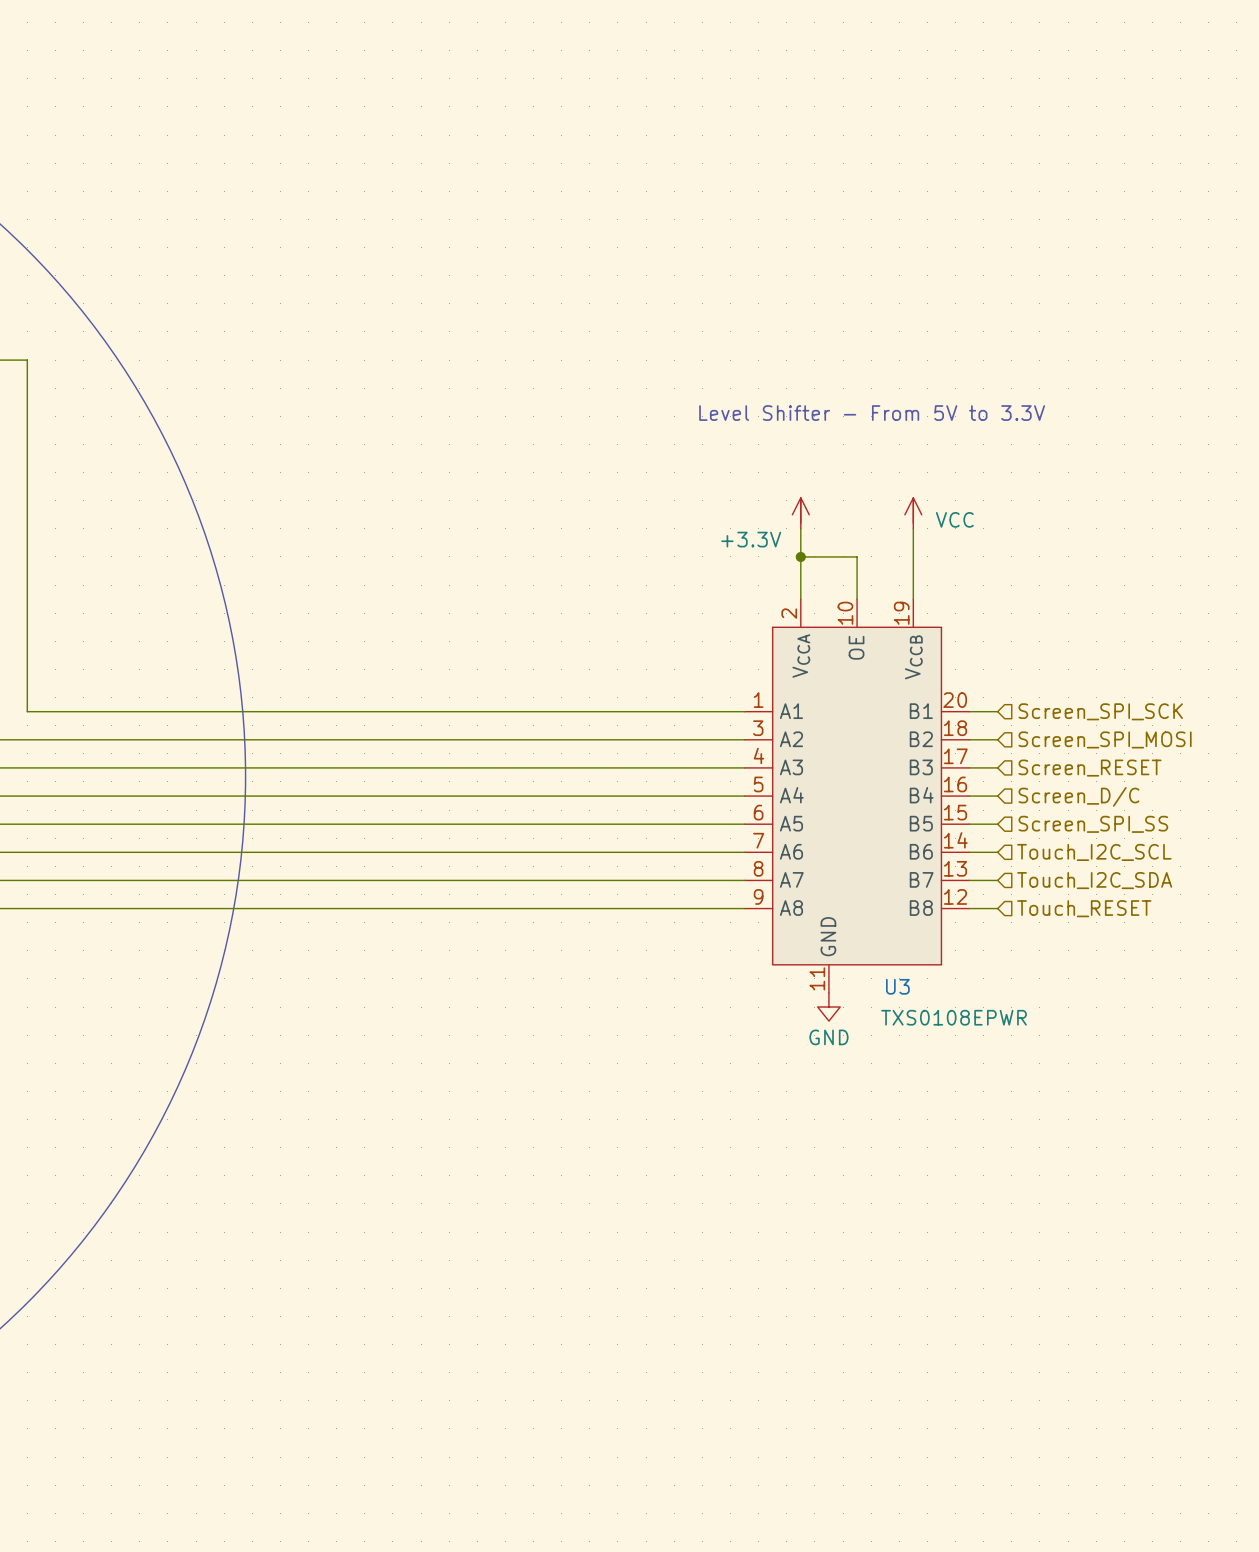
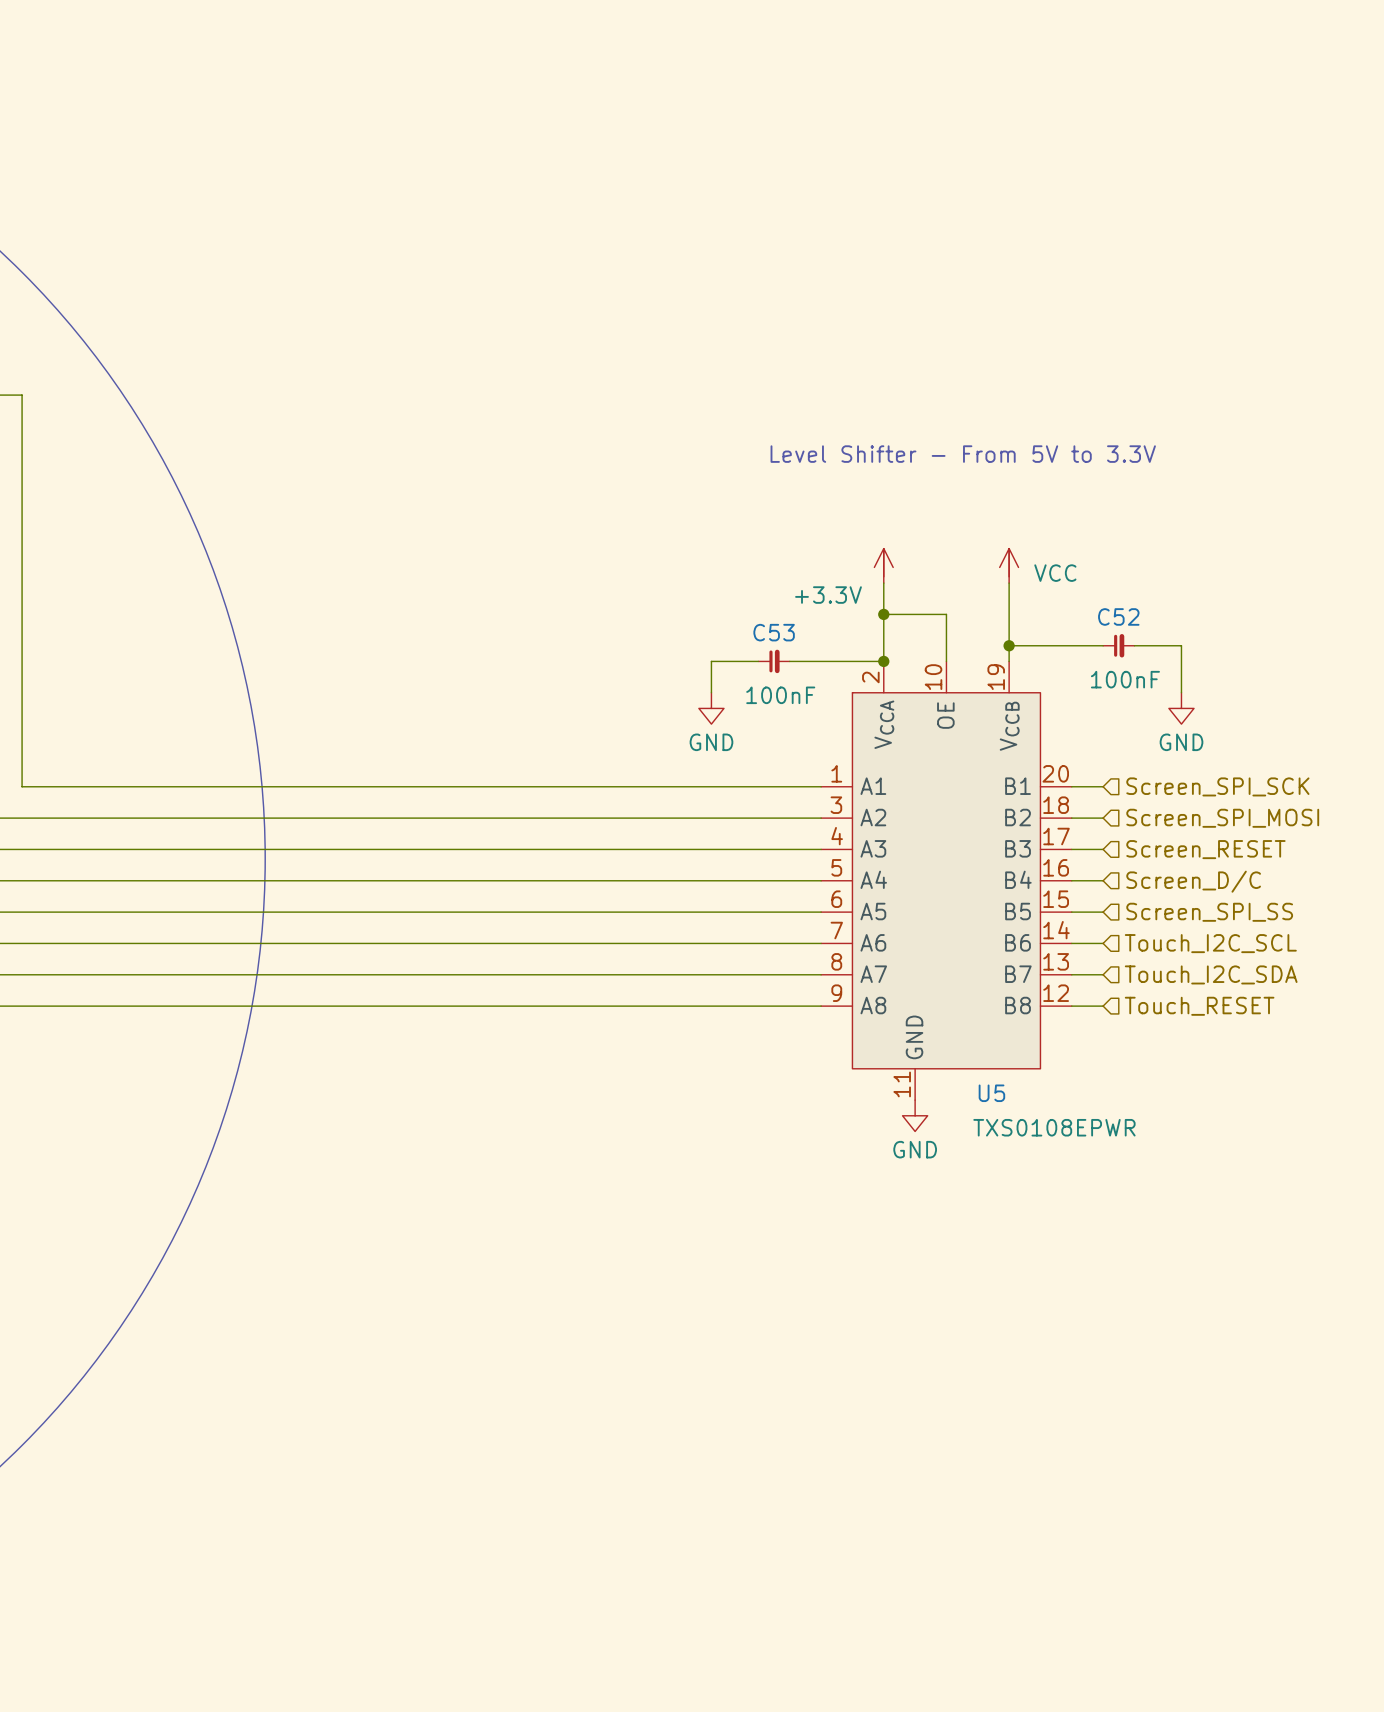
wire: none -> (1009, 645) (1103, 645)
junction: none -> (1009, 645)
C52: none -> 100nF (1118, 645)
wire: none -> (1134, 645) (1181, 645) (1181, 692)
wire: none -> (758, 661) (711, 661) (711, 692)
C53: none -> 100nF (774, 661)
wire: none -> (789, 661) (883, 661)
junction: none -> (883, 661)
power symbol: none -> GND (711, 708)
power symbol: none -> GND (1181, 708)
U3 name: U3 (897, 986) -> U5 (991, 1093)

